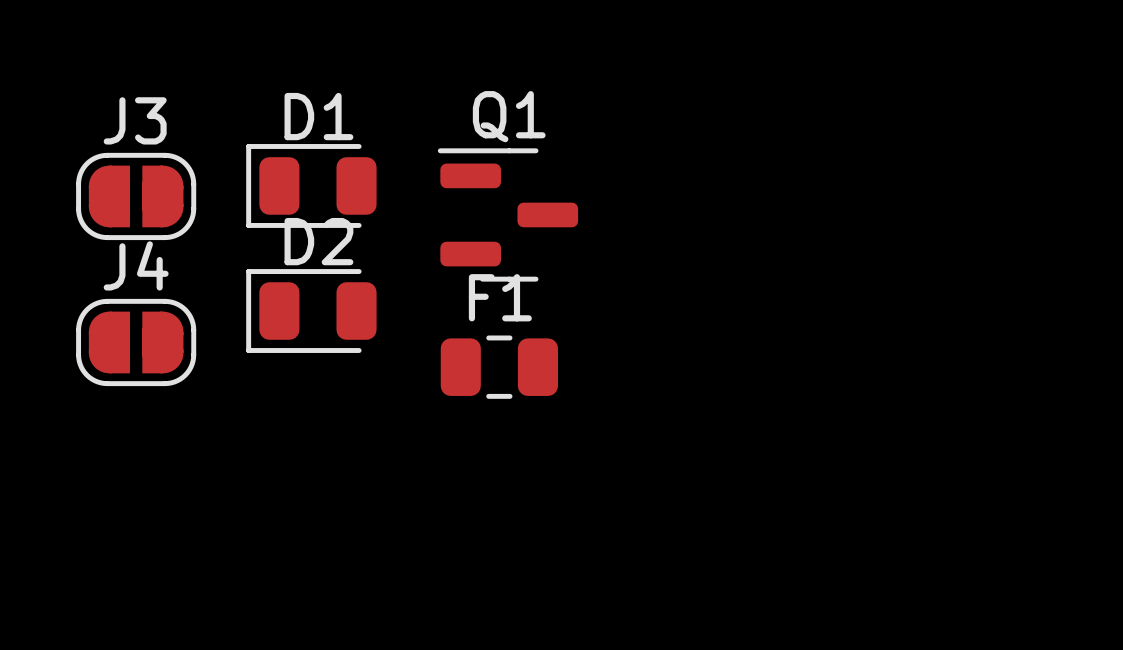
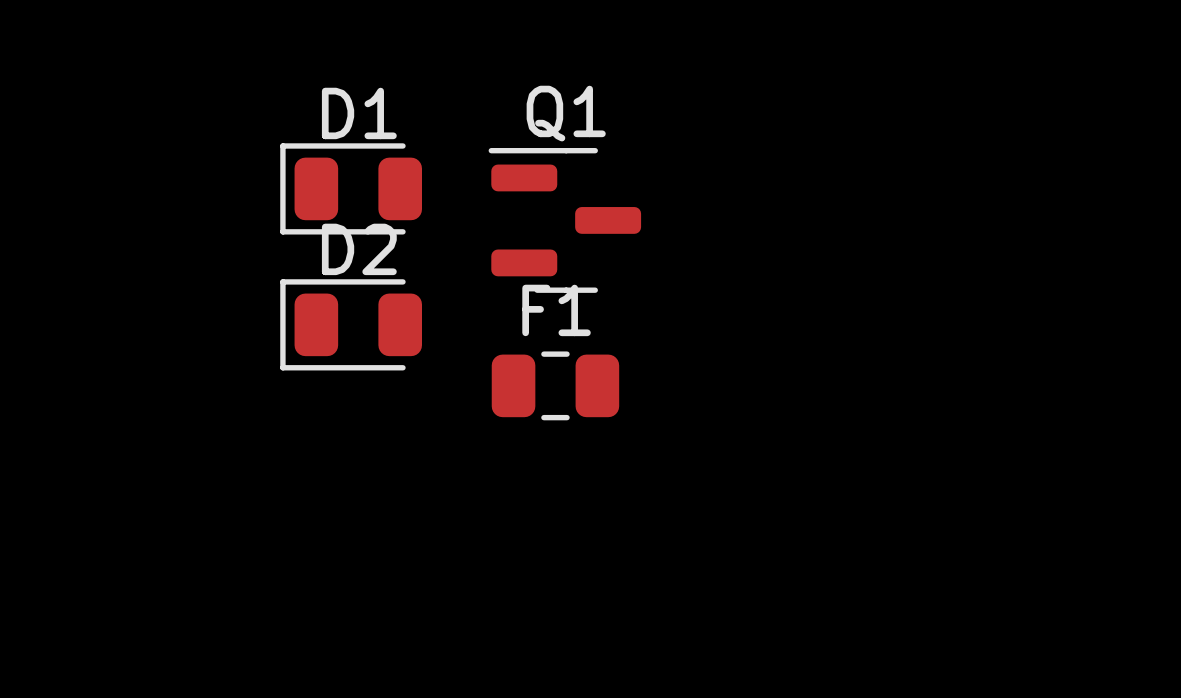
J3: (136, 196) -> none
J4: (136, 342) -> none

